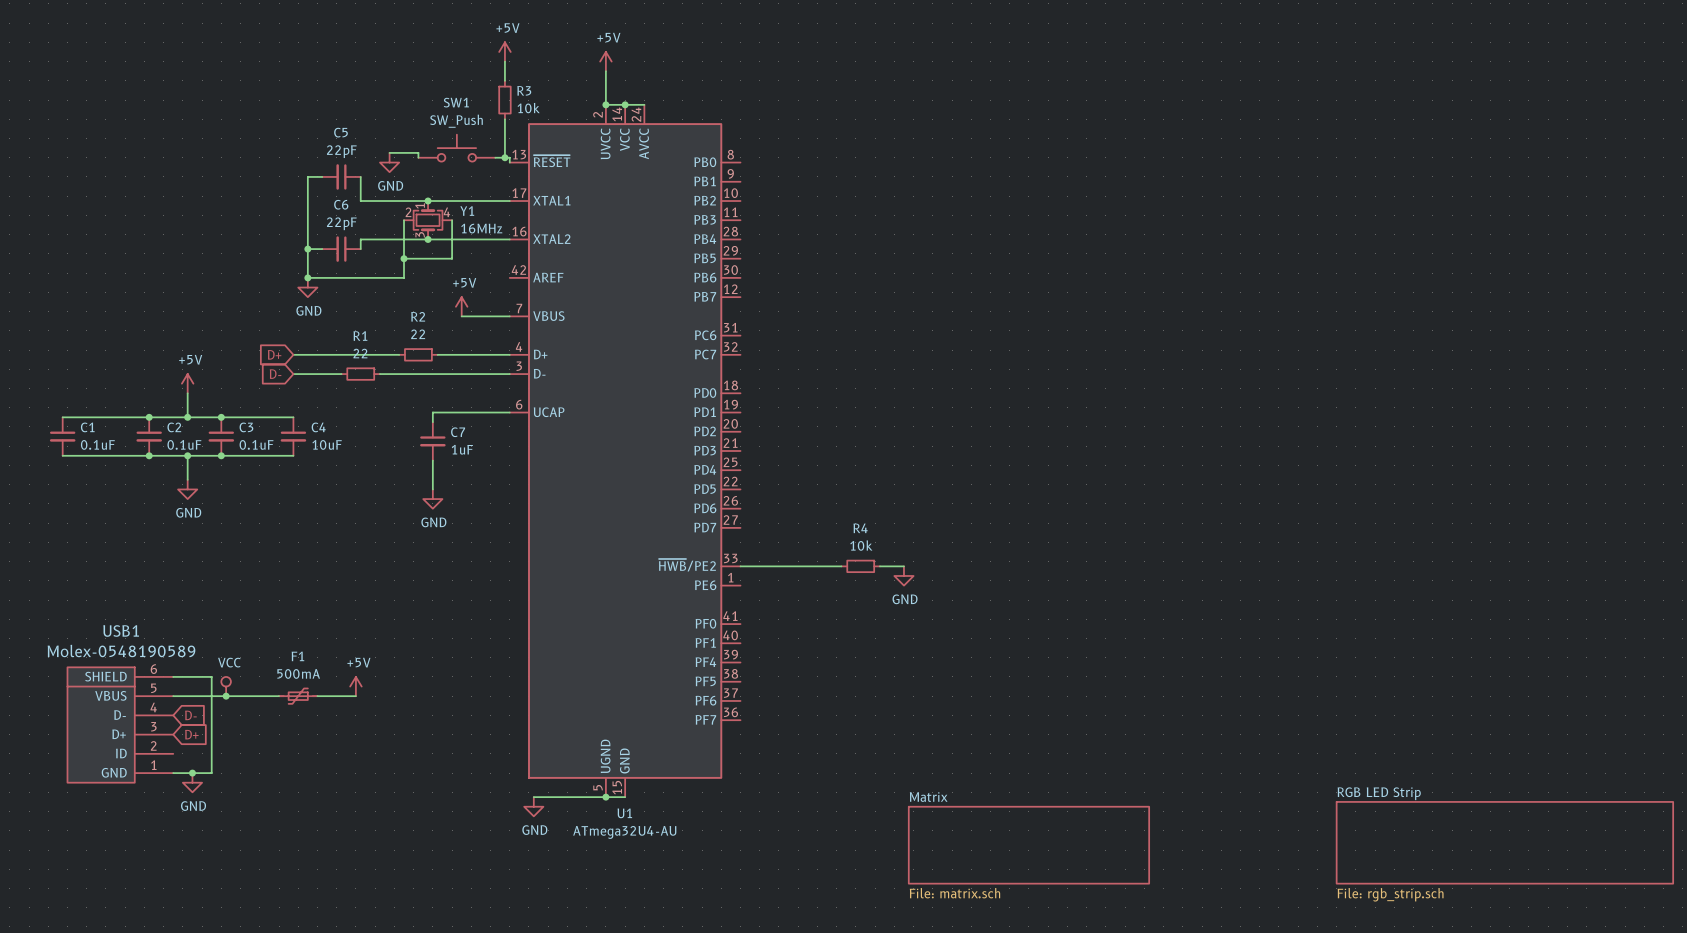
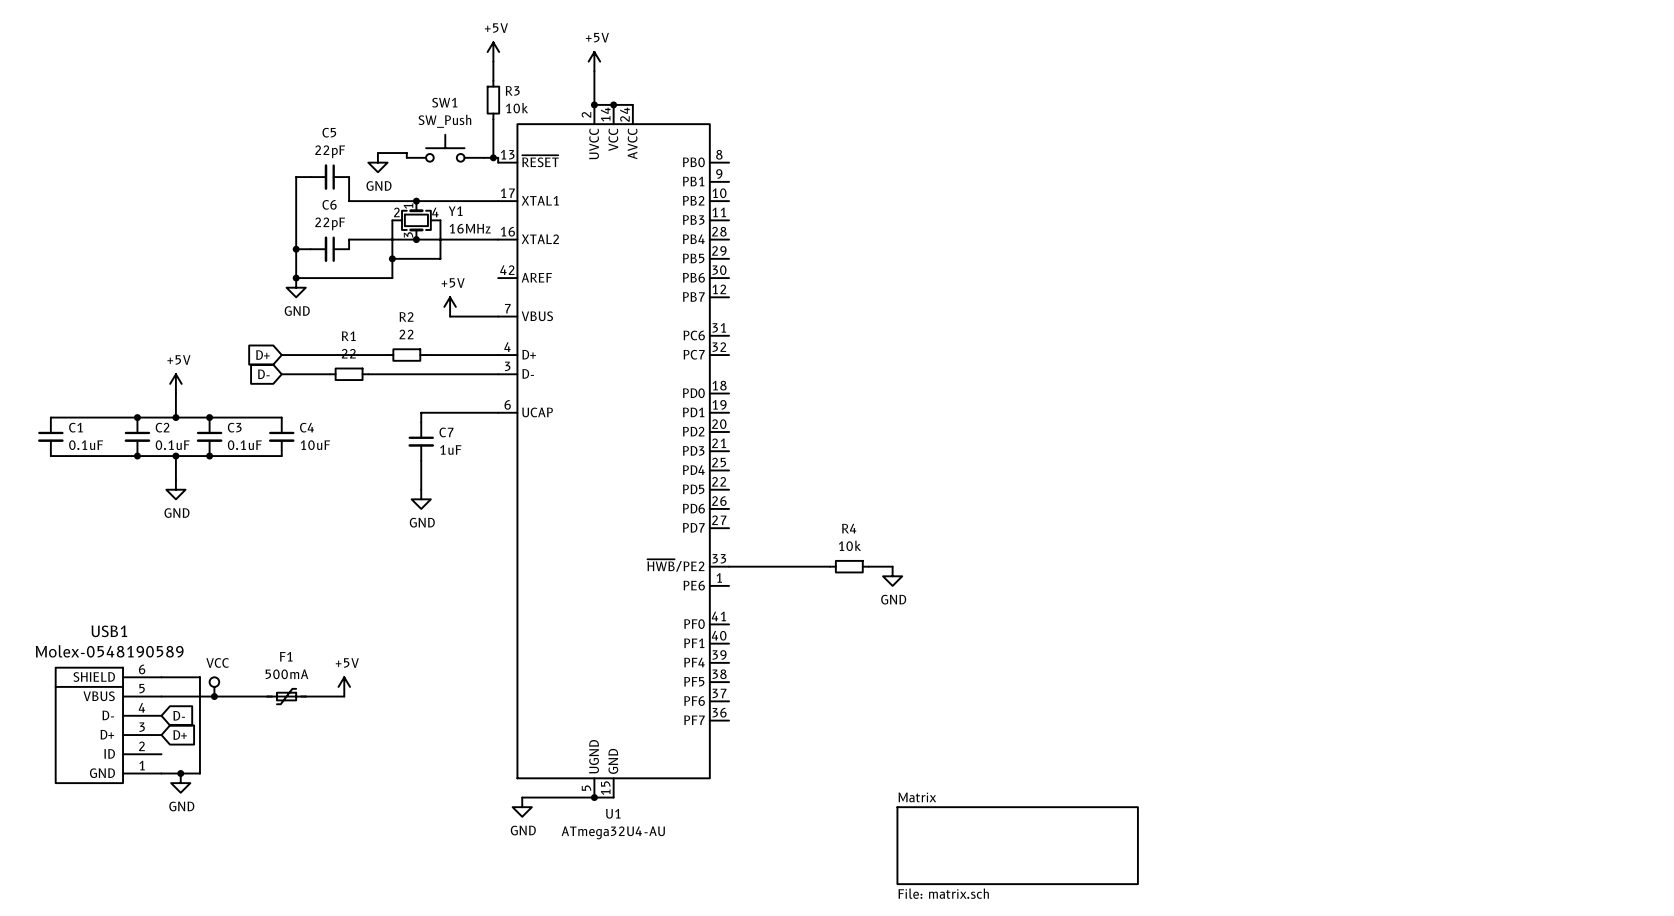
sheet RGB LED Strip: File: rgb_strip.sch (1504, 842) -> none

